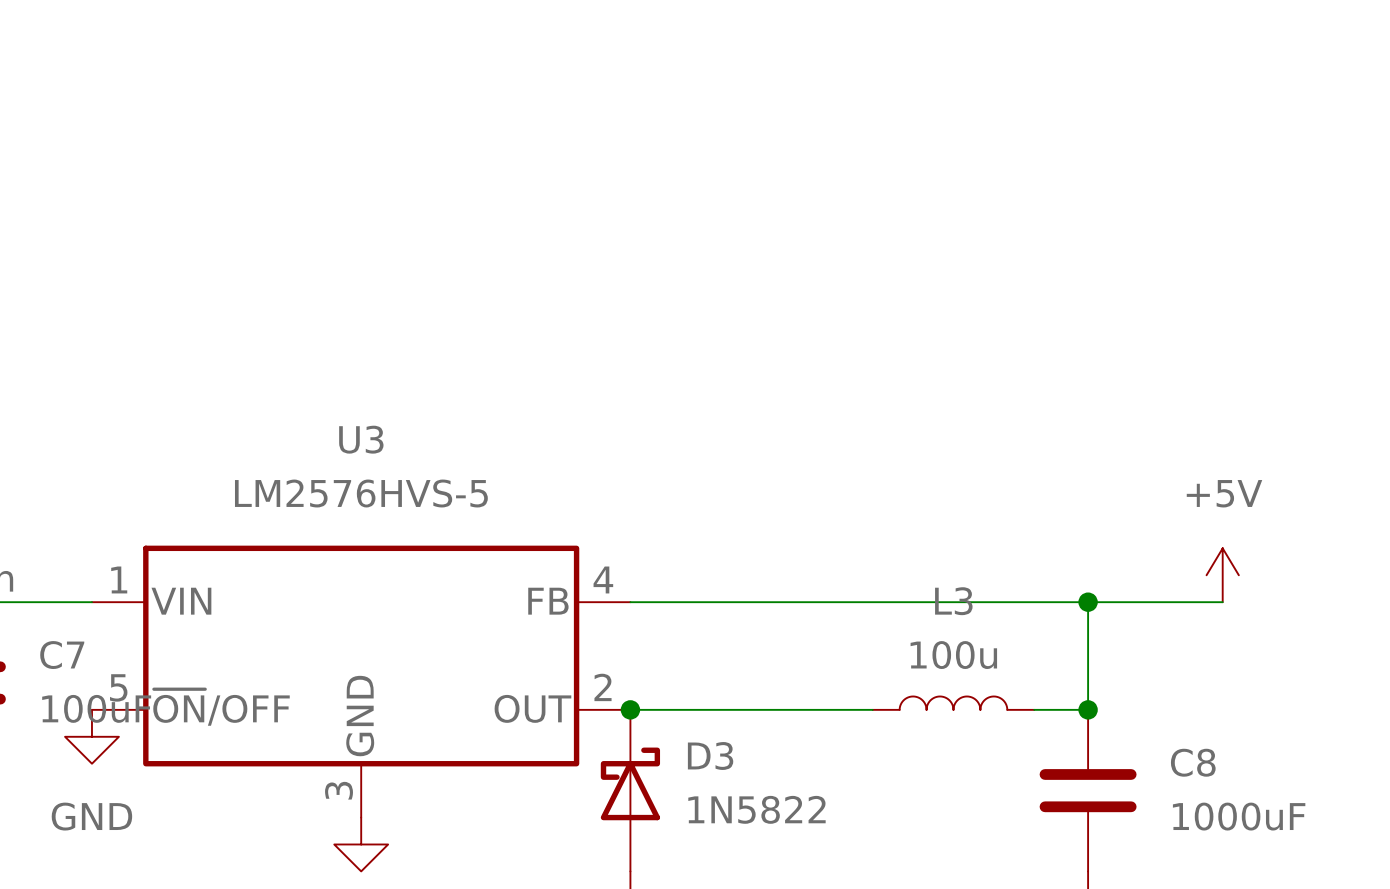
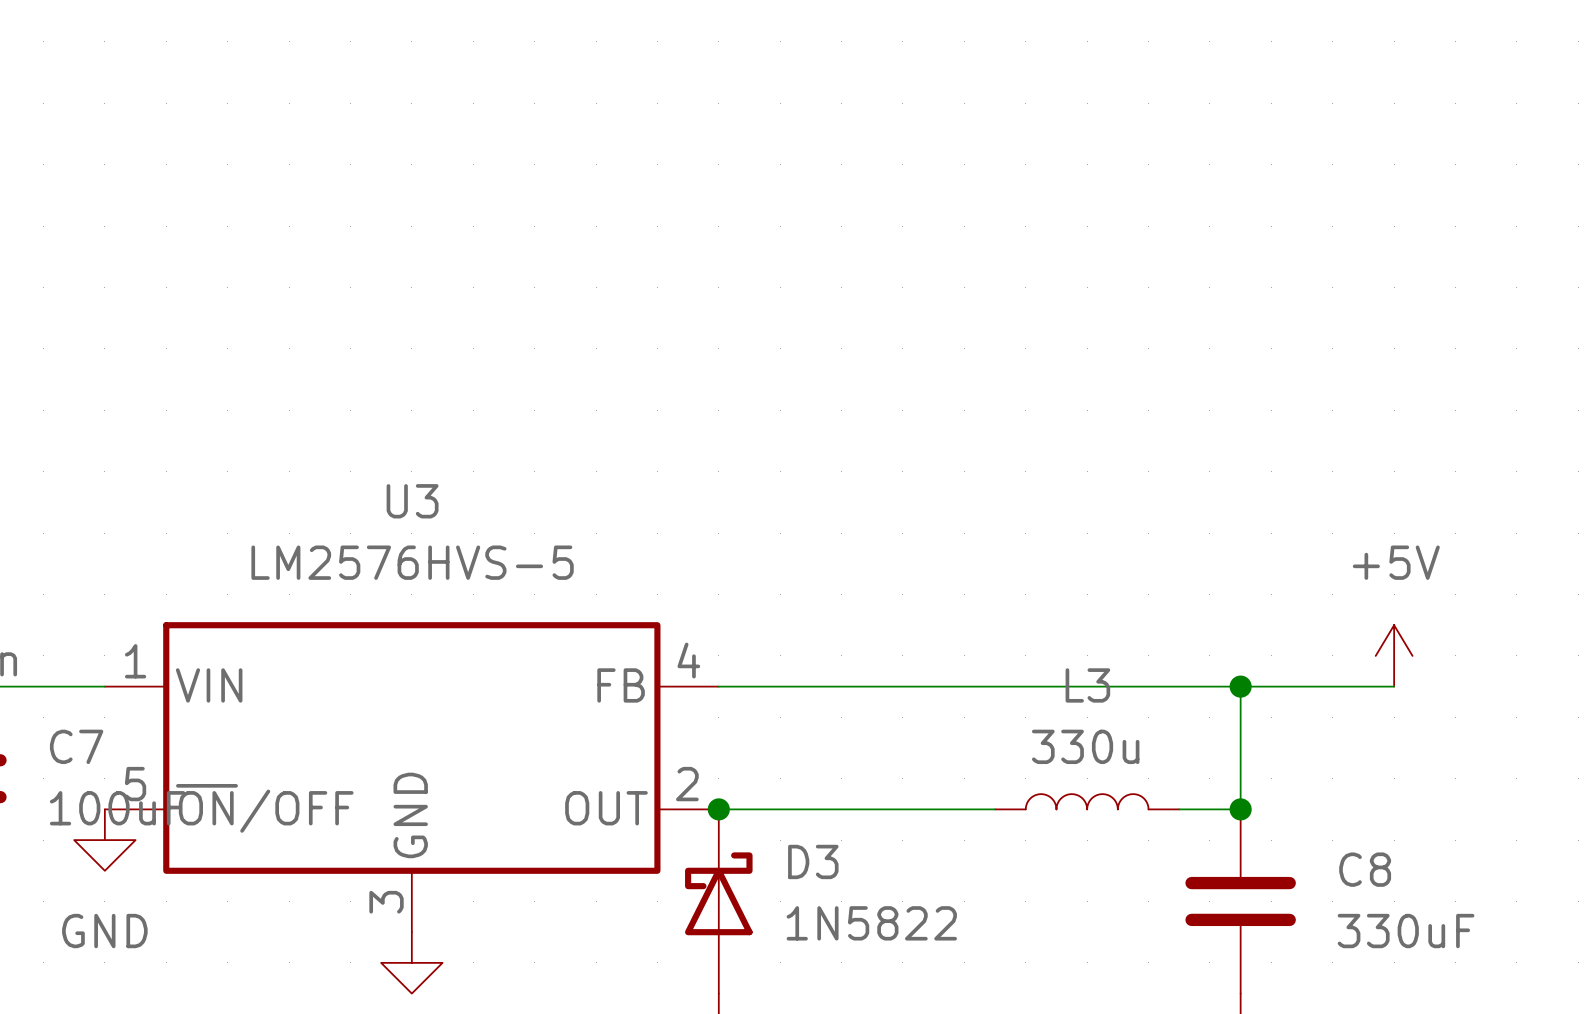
L3 value: 100u (953, 655) -> 330u (1085, 746)
C8 value: 1000uF (1239, 816) -> 330uF (1406, 931)

